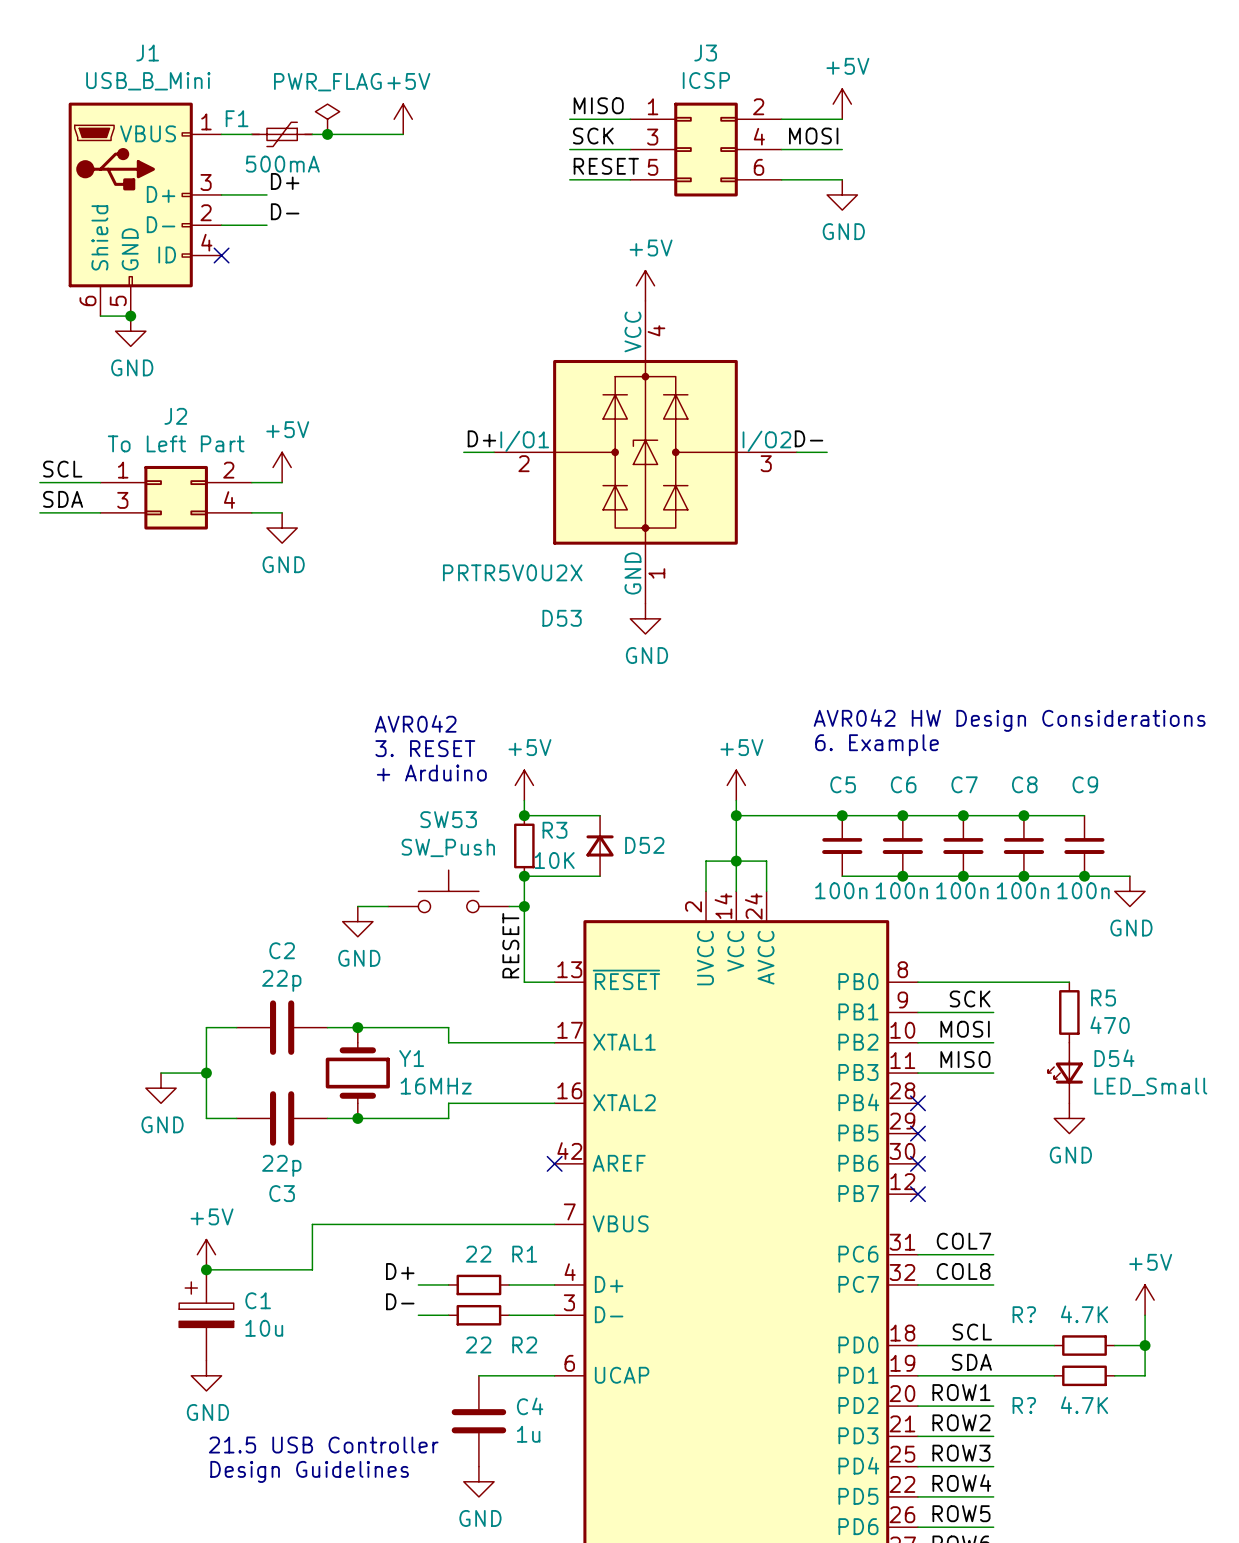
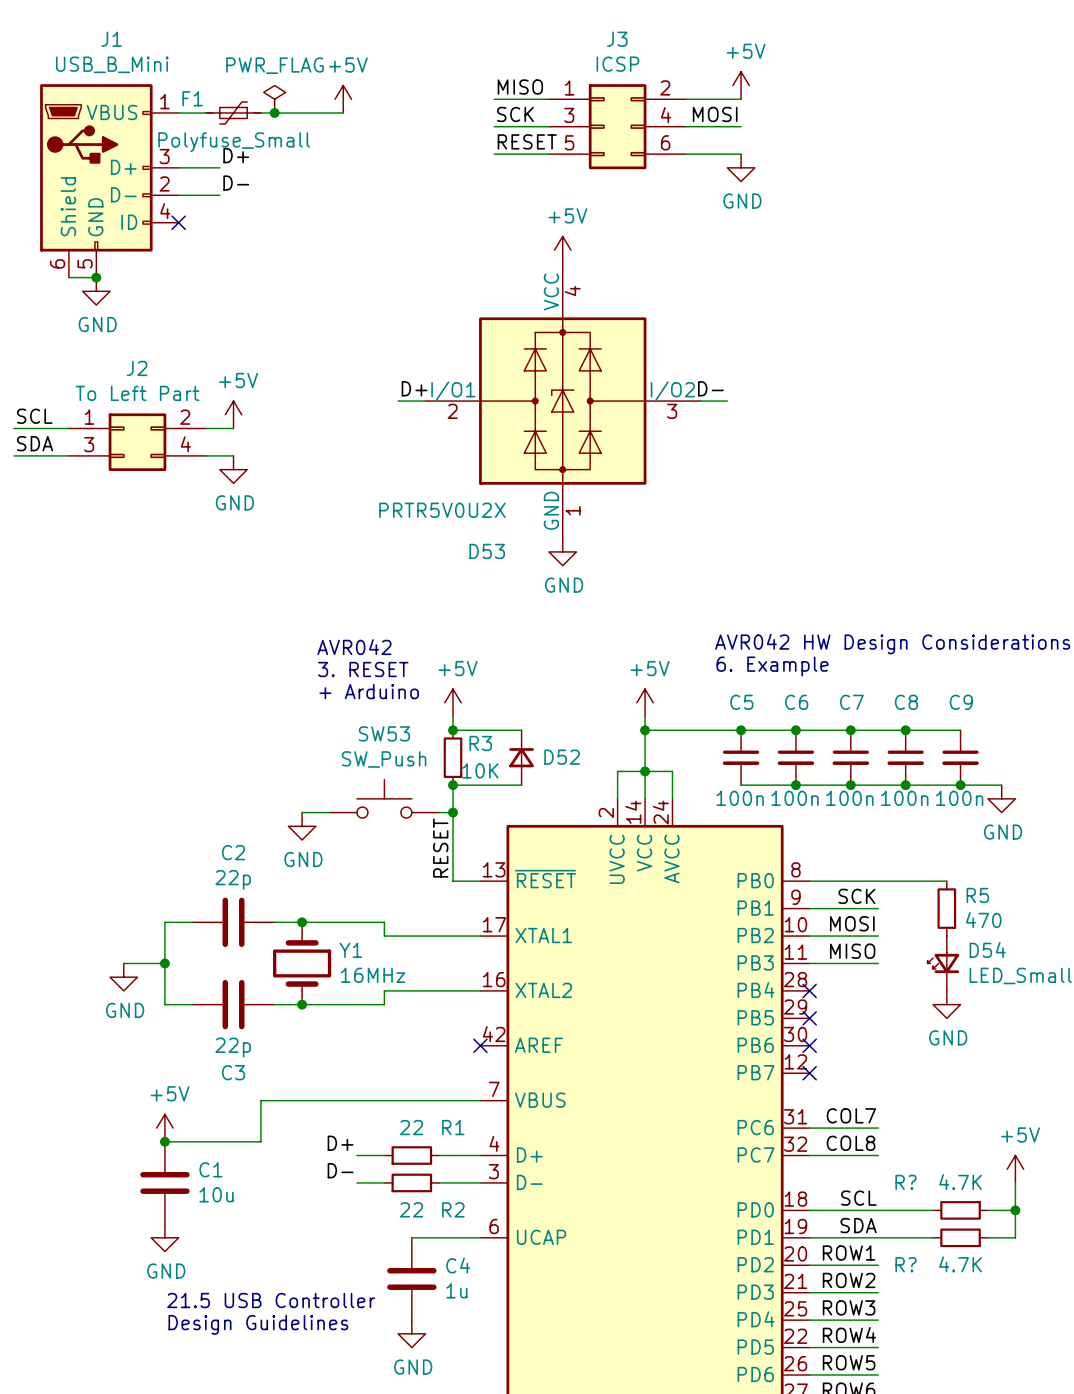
F1 value: 500mA (282, 164) -> Polyfuse_Small (234, 142)
C1 symbol: [179, 1269, 234, 1361] -> [140, 1141, 190, 1225]

